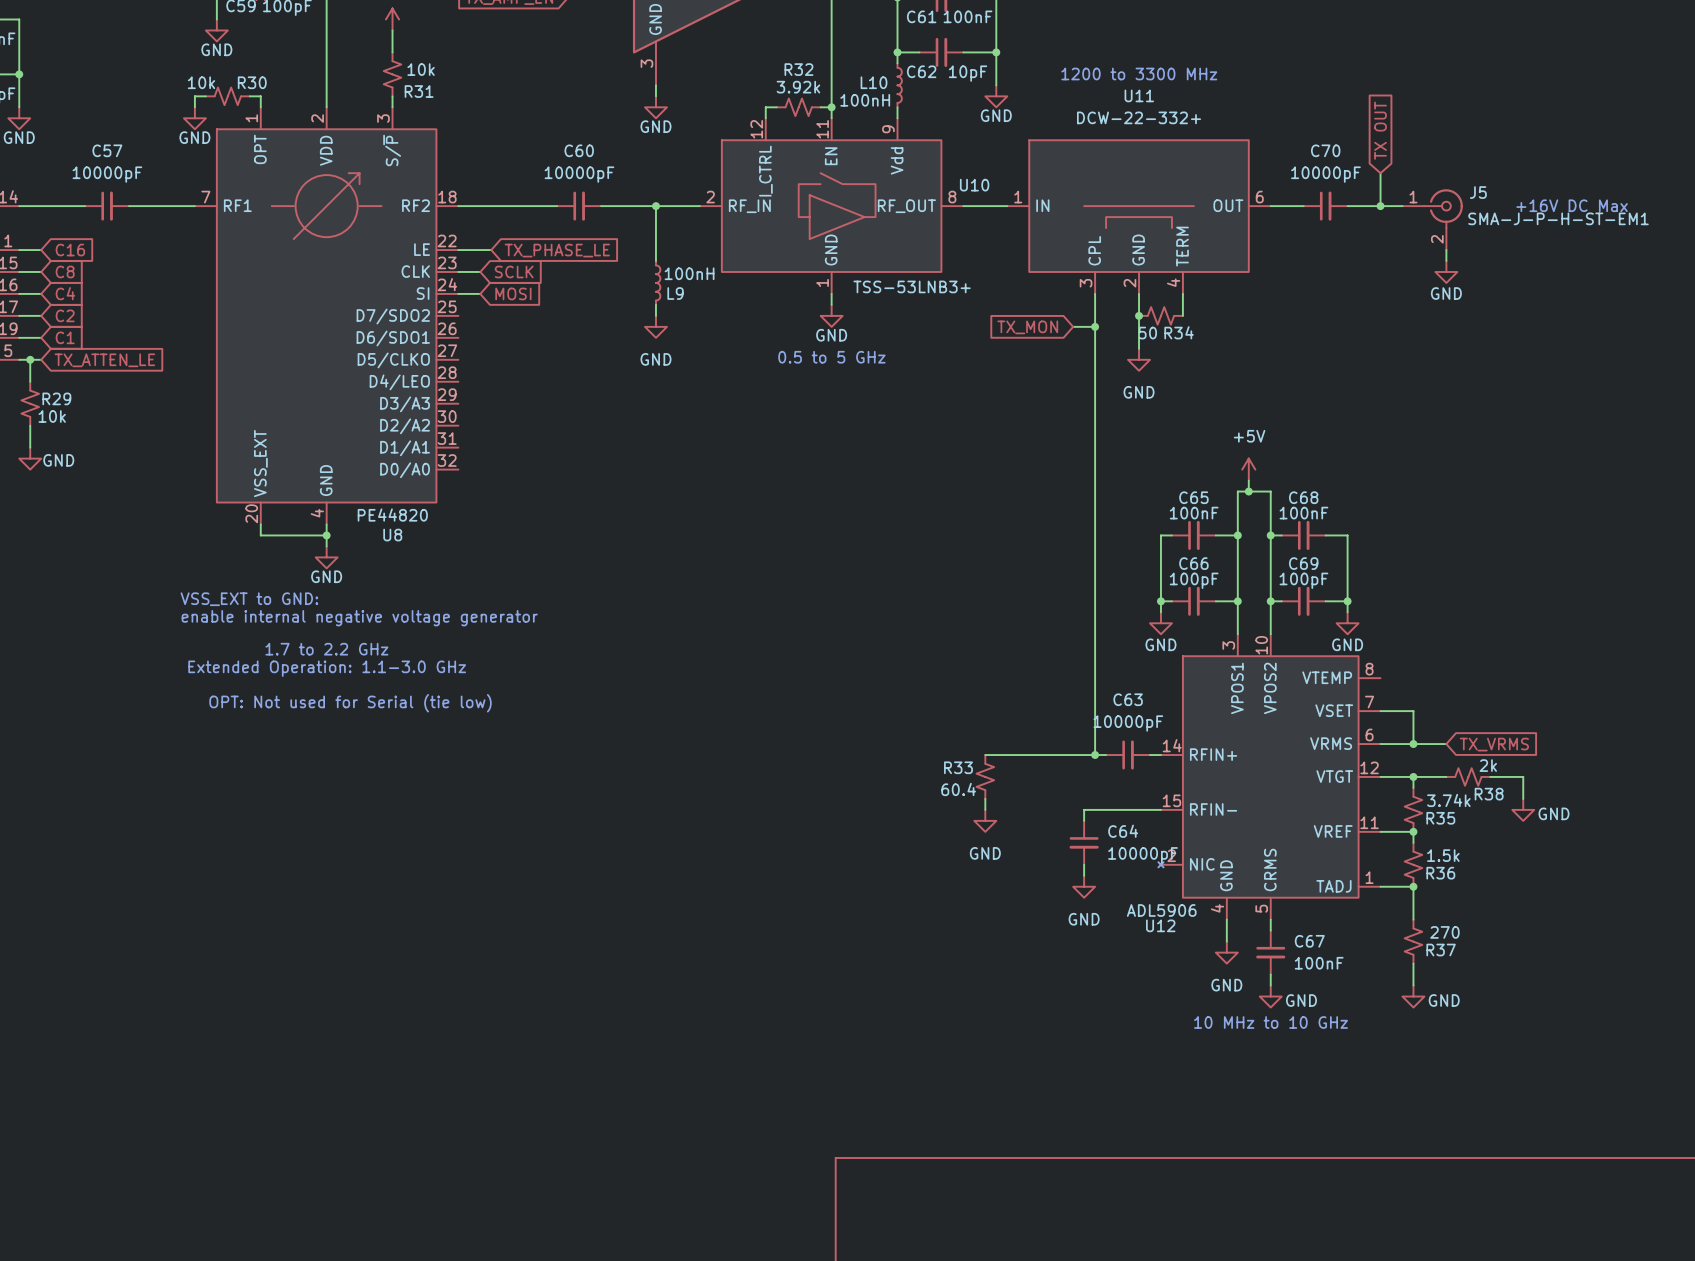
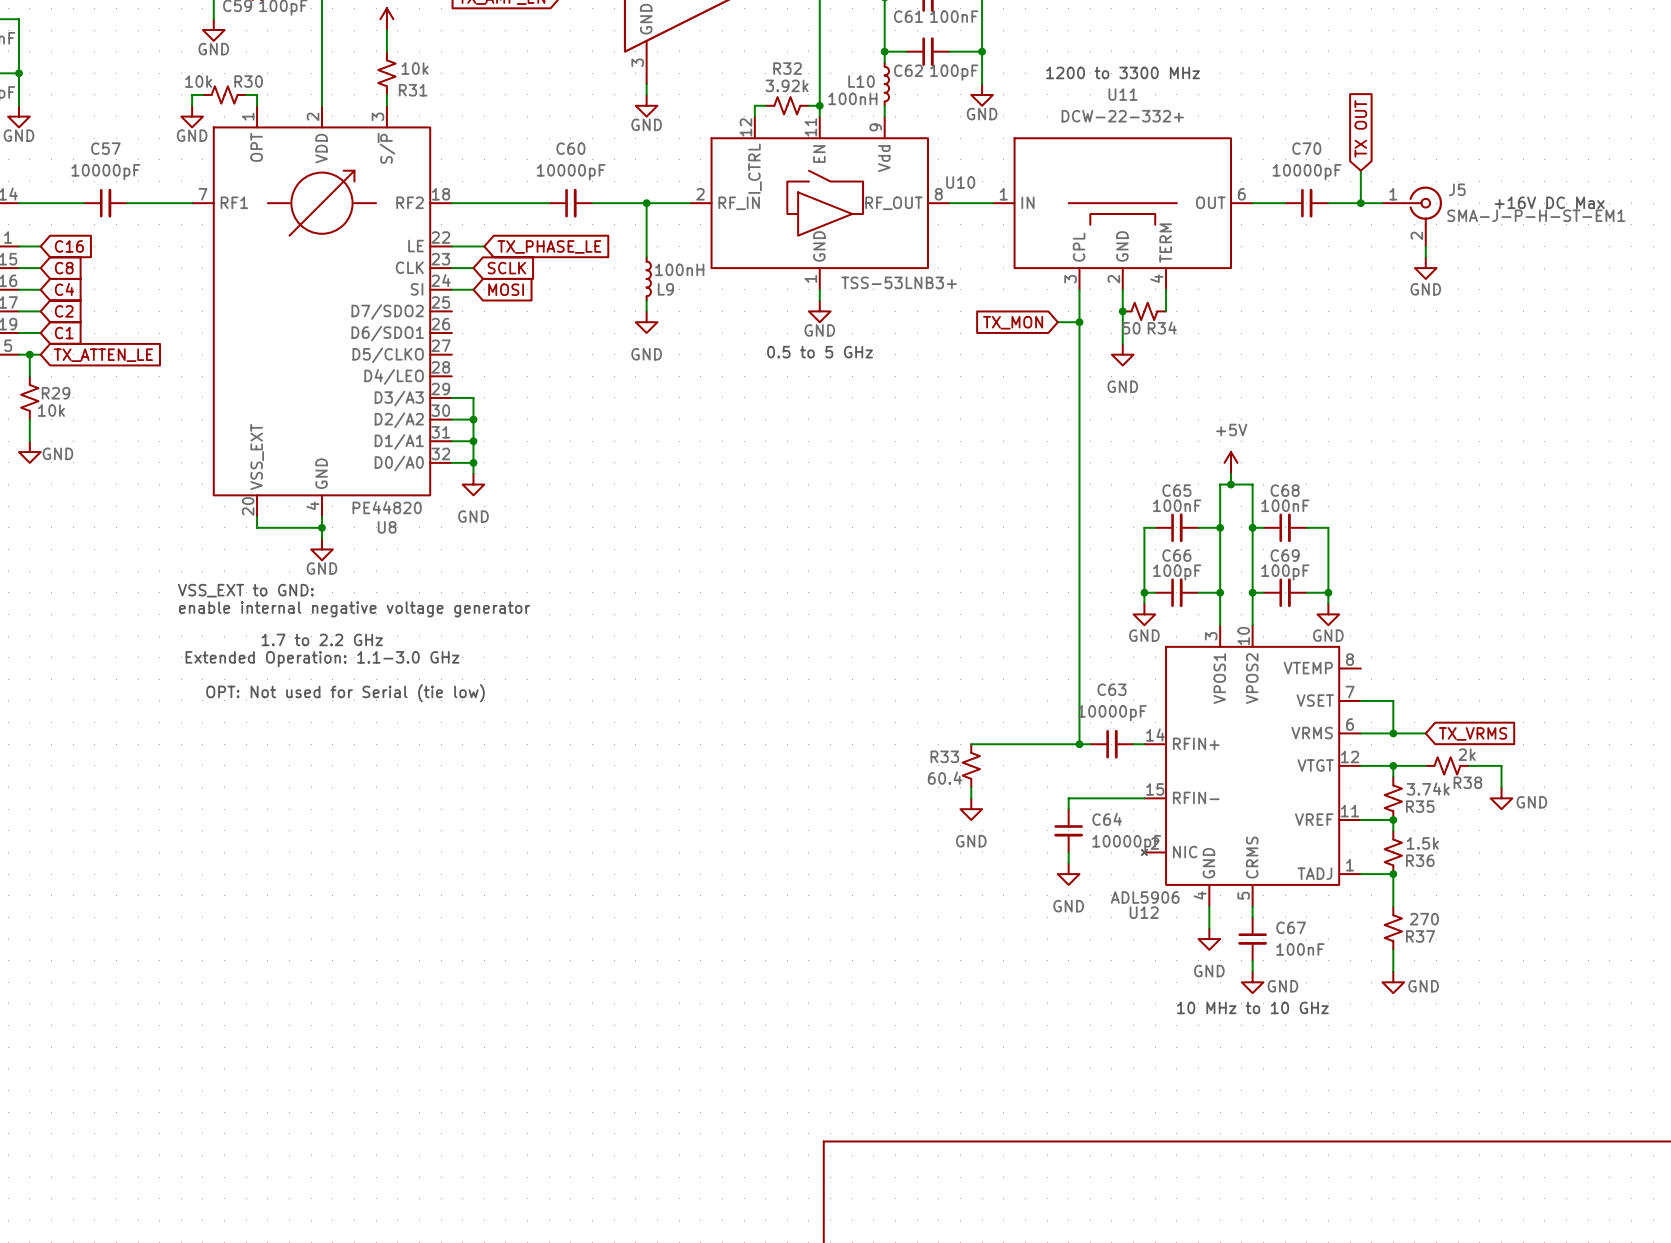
C62 value: 10pF (968, 73) -> 100pF (954, 72)
wire: none -> (451, 397) (473, 397) (473, 473)
wire: none -> (451, 419) (473, 419)
junction: none -> (473, 419)
wire: none -> (451, 441) (473, 441)
junction: none -> (473, 441)
wire: none -> (451, 462) (473, 462)
junction: none -> (473, 462)
power symbol: none -> GND (473, 484)

